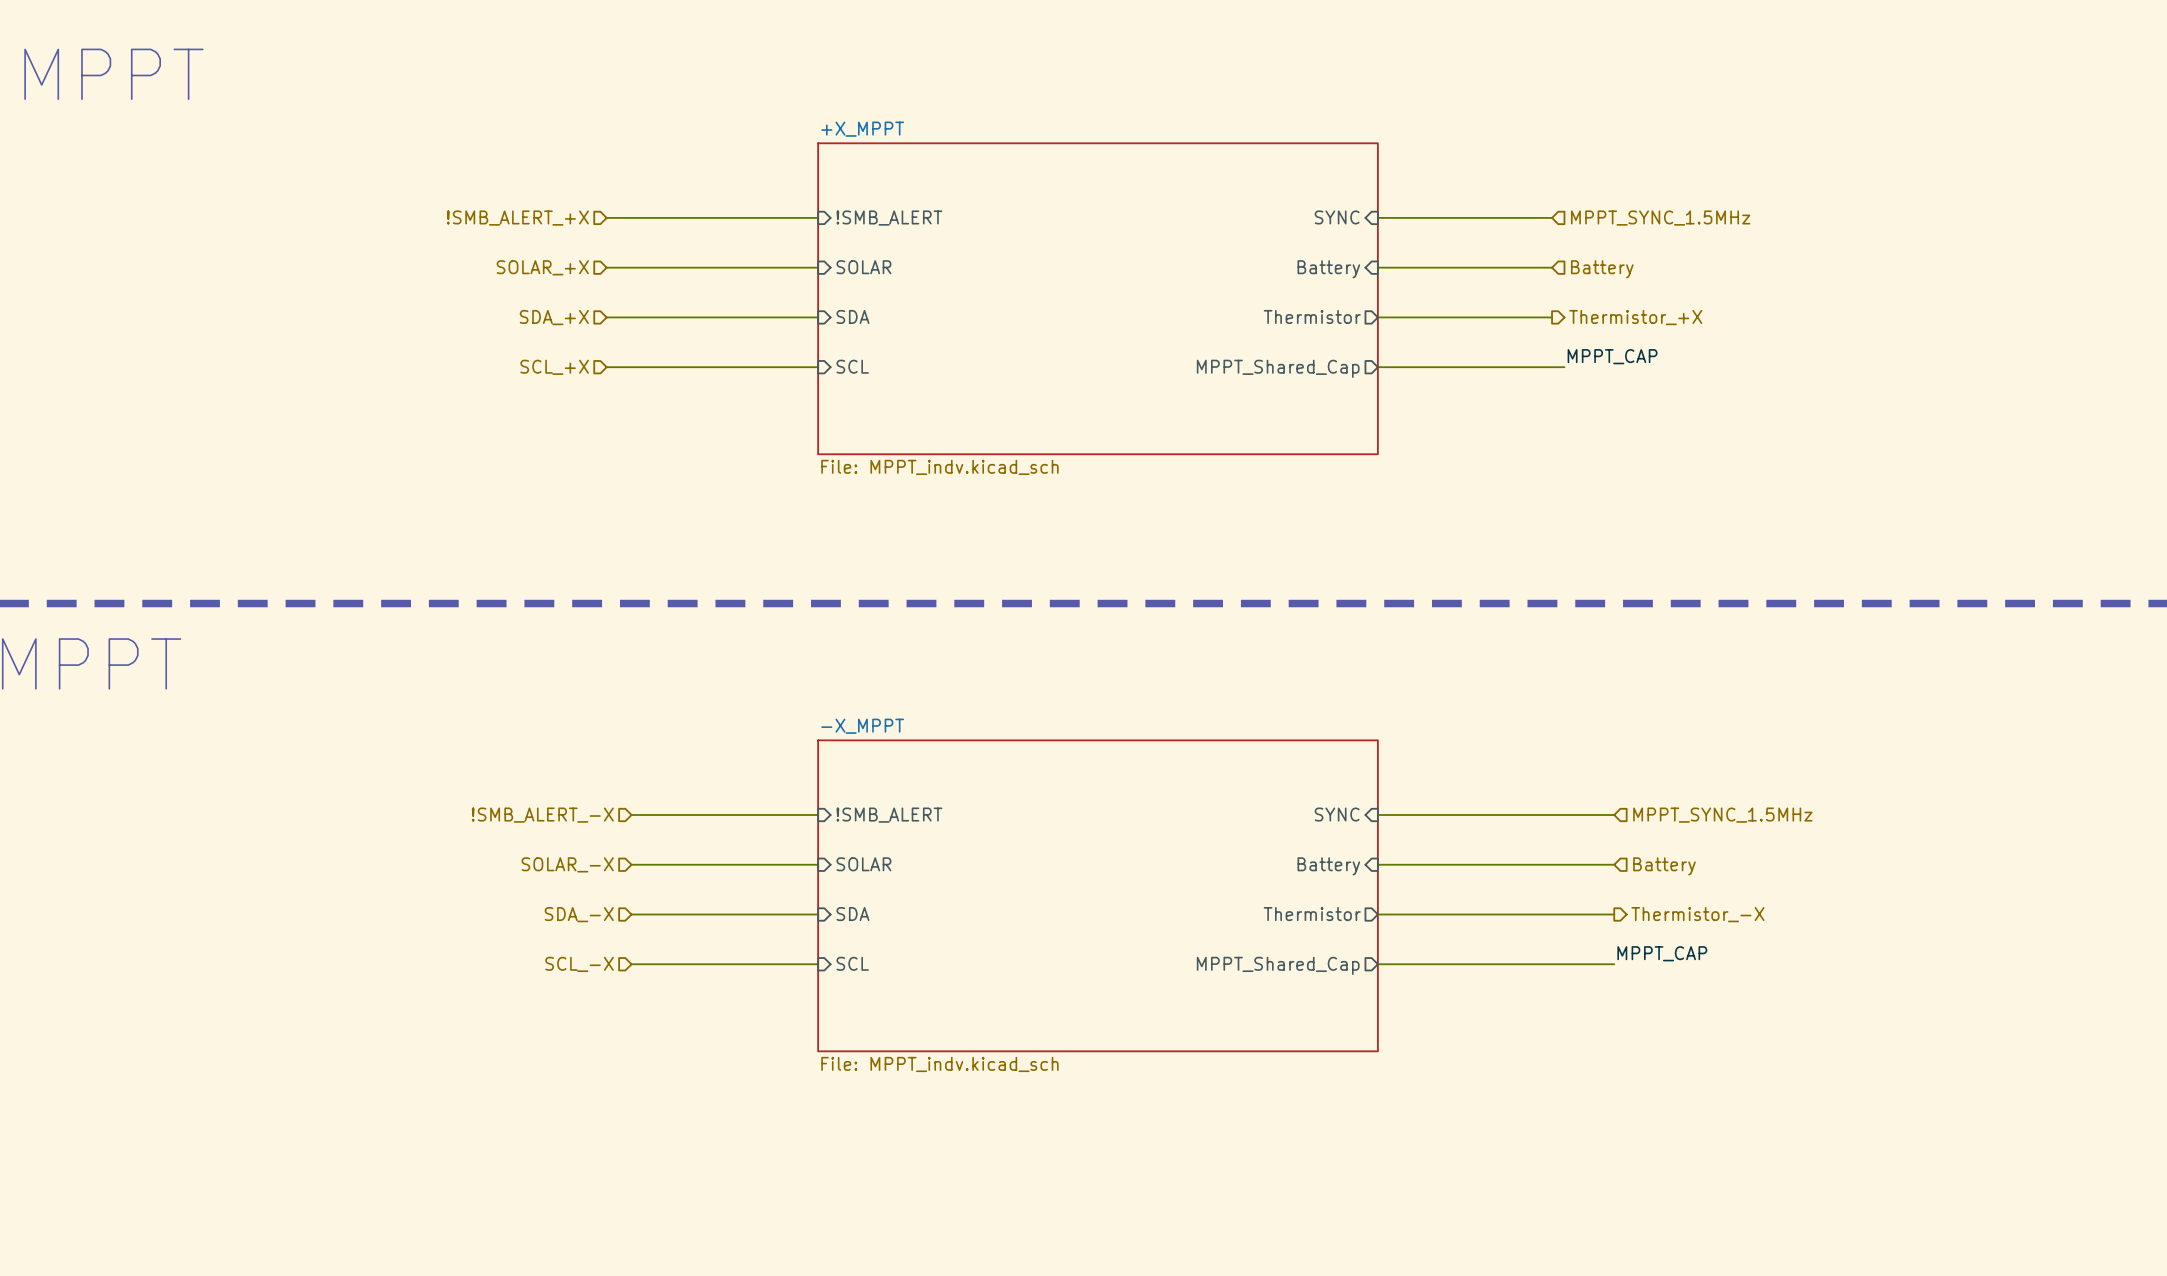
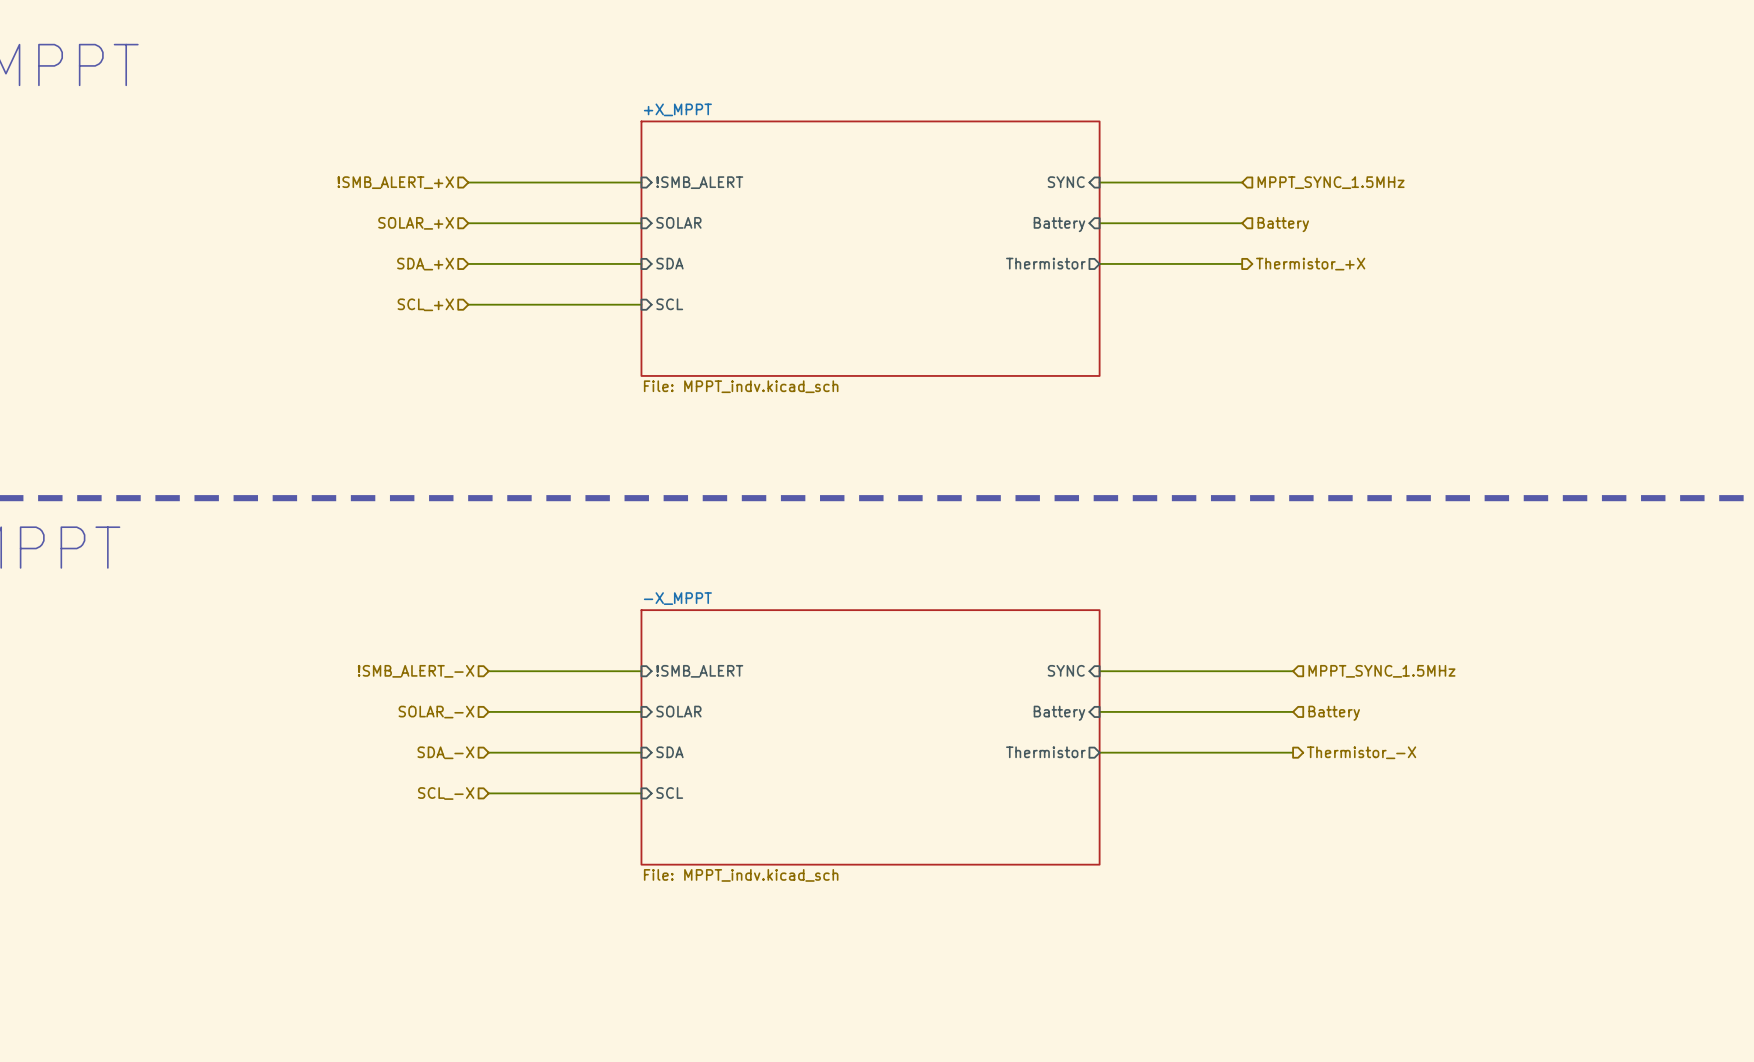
label: MPPT_CAP (1612, 356) -> none
wire: (1377, 367) (1564, 367) -> none
sheet pin: MPPT_Shared_Cap (1278, 368) -> none
label: MPPT_CAP (1662, 953) -> none
wire: (1377, 964) (1614, 964) -> none
sheet pin: MPPT_Shared_Cap (1278, 965) -> none

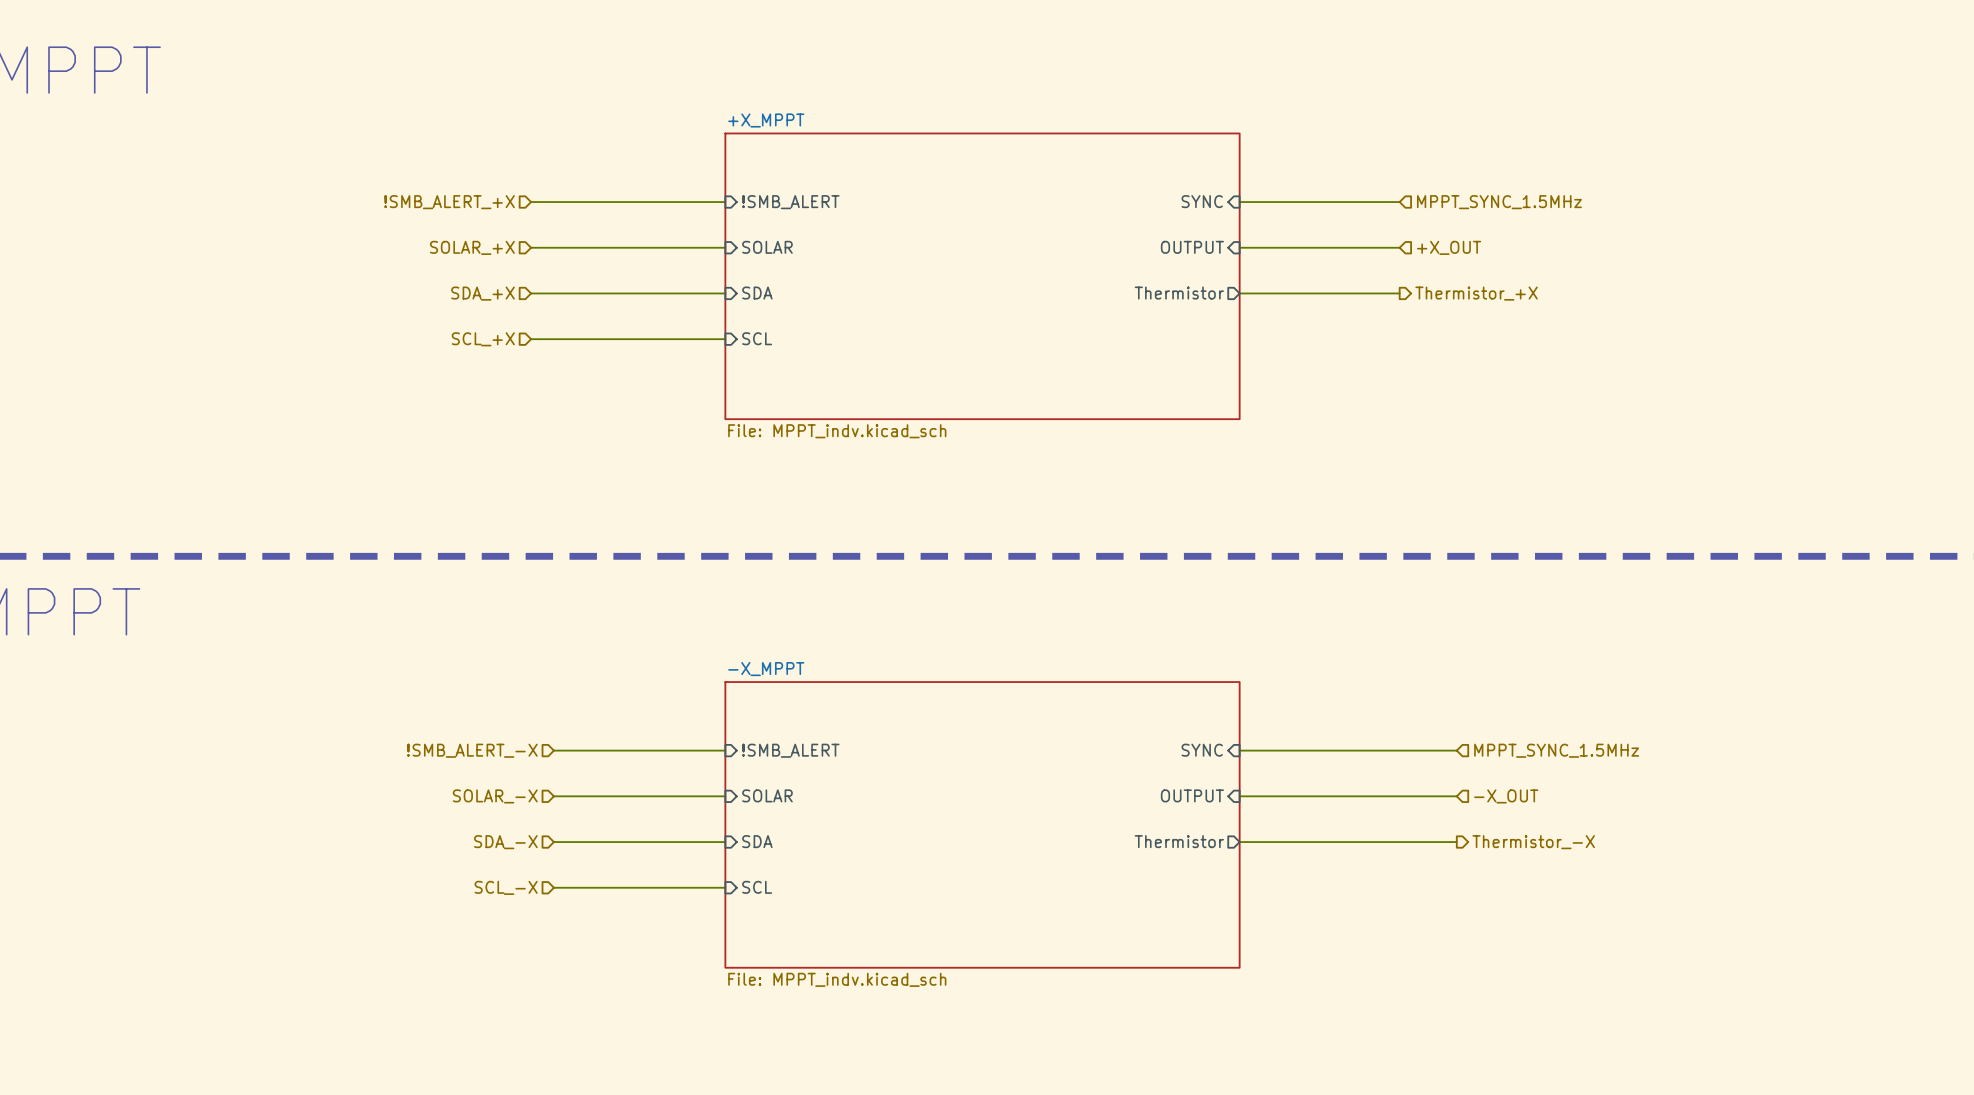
sheet pin: Battery (1059, 224) -> OUTPUT (1192, 247)
hierarchical label: Battery (1283, 224) -> +X_OUT (1449, 247)
sheet pin: Battery (1059, 713) -> OUTPUT (1192, 795)
hierarchical label: Battery (1334, 713) -> -X_OUT (1506, 796)

